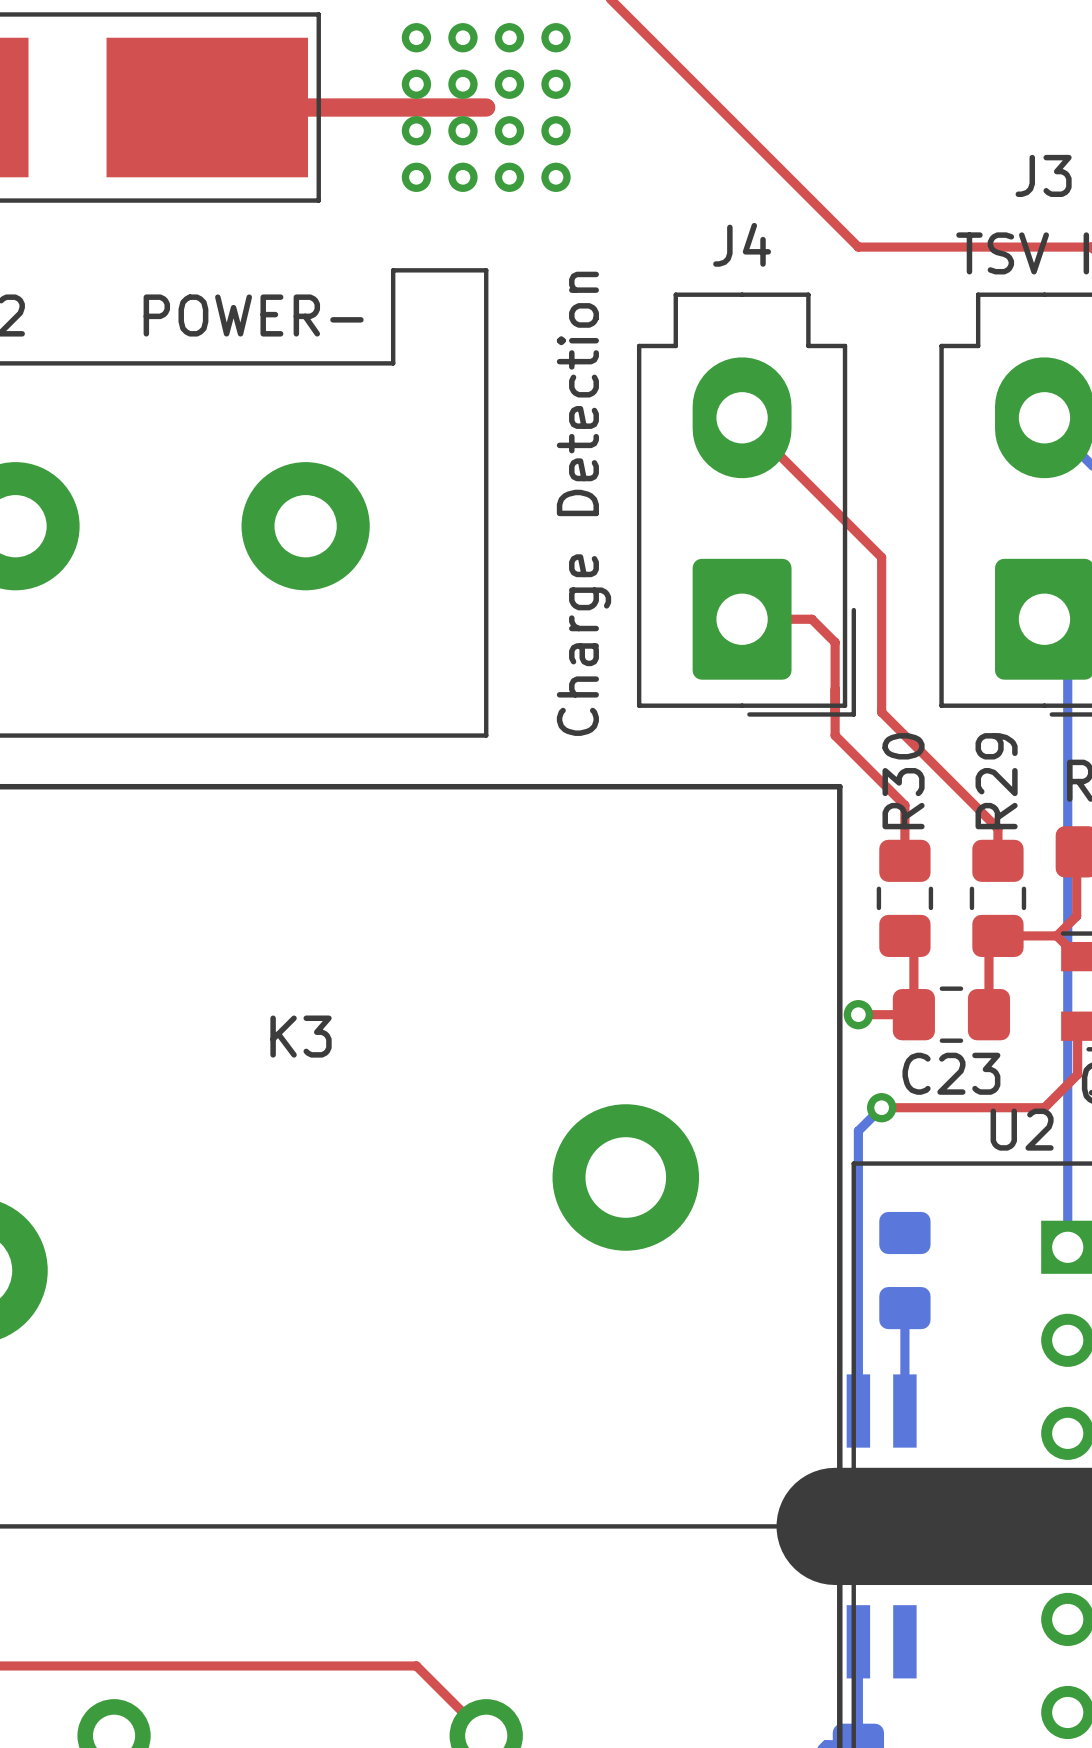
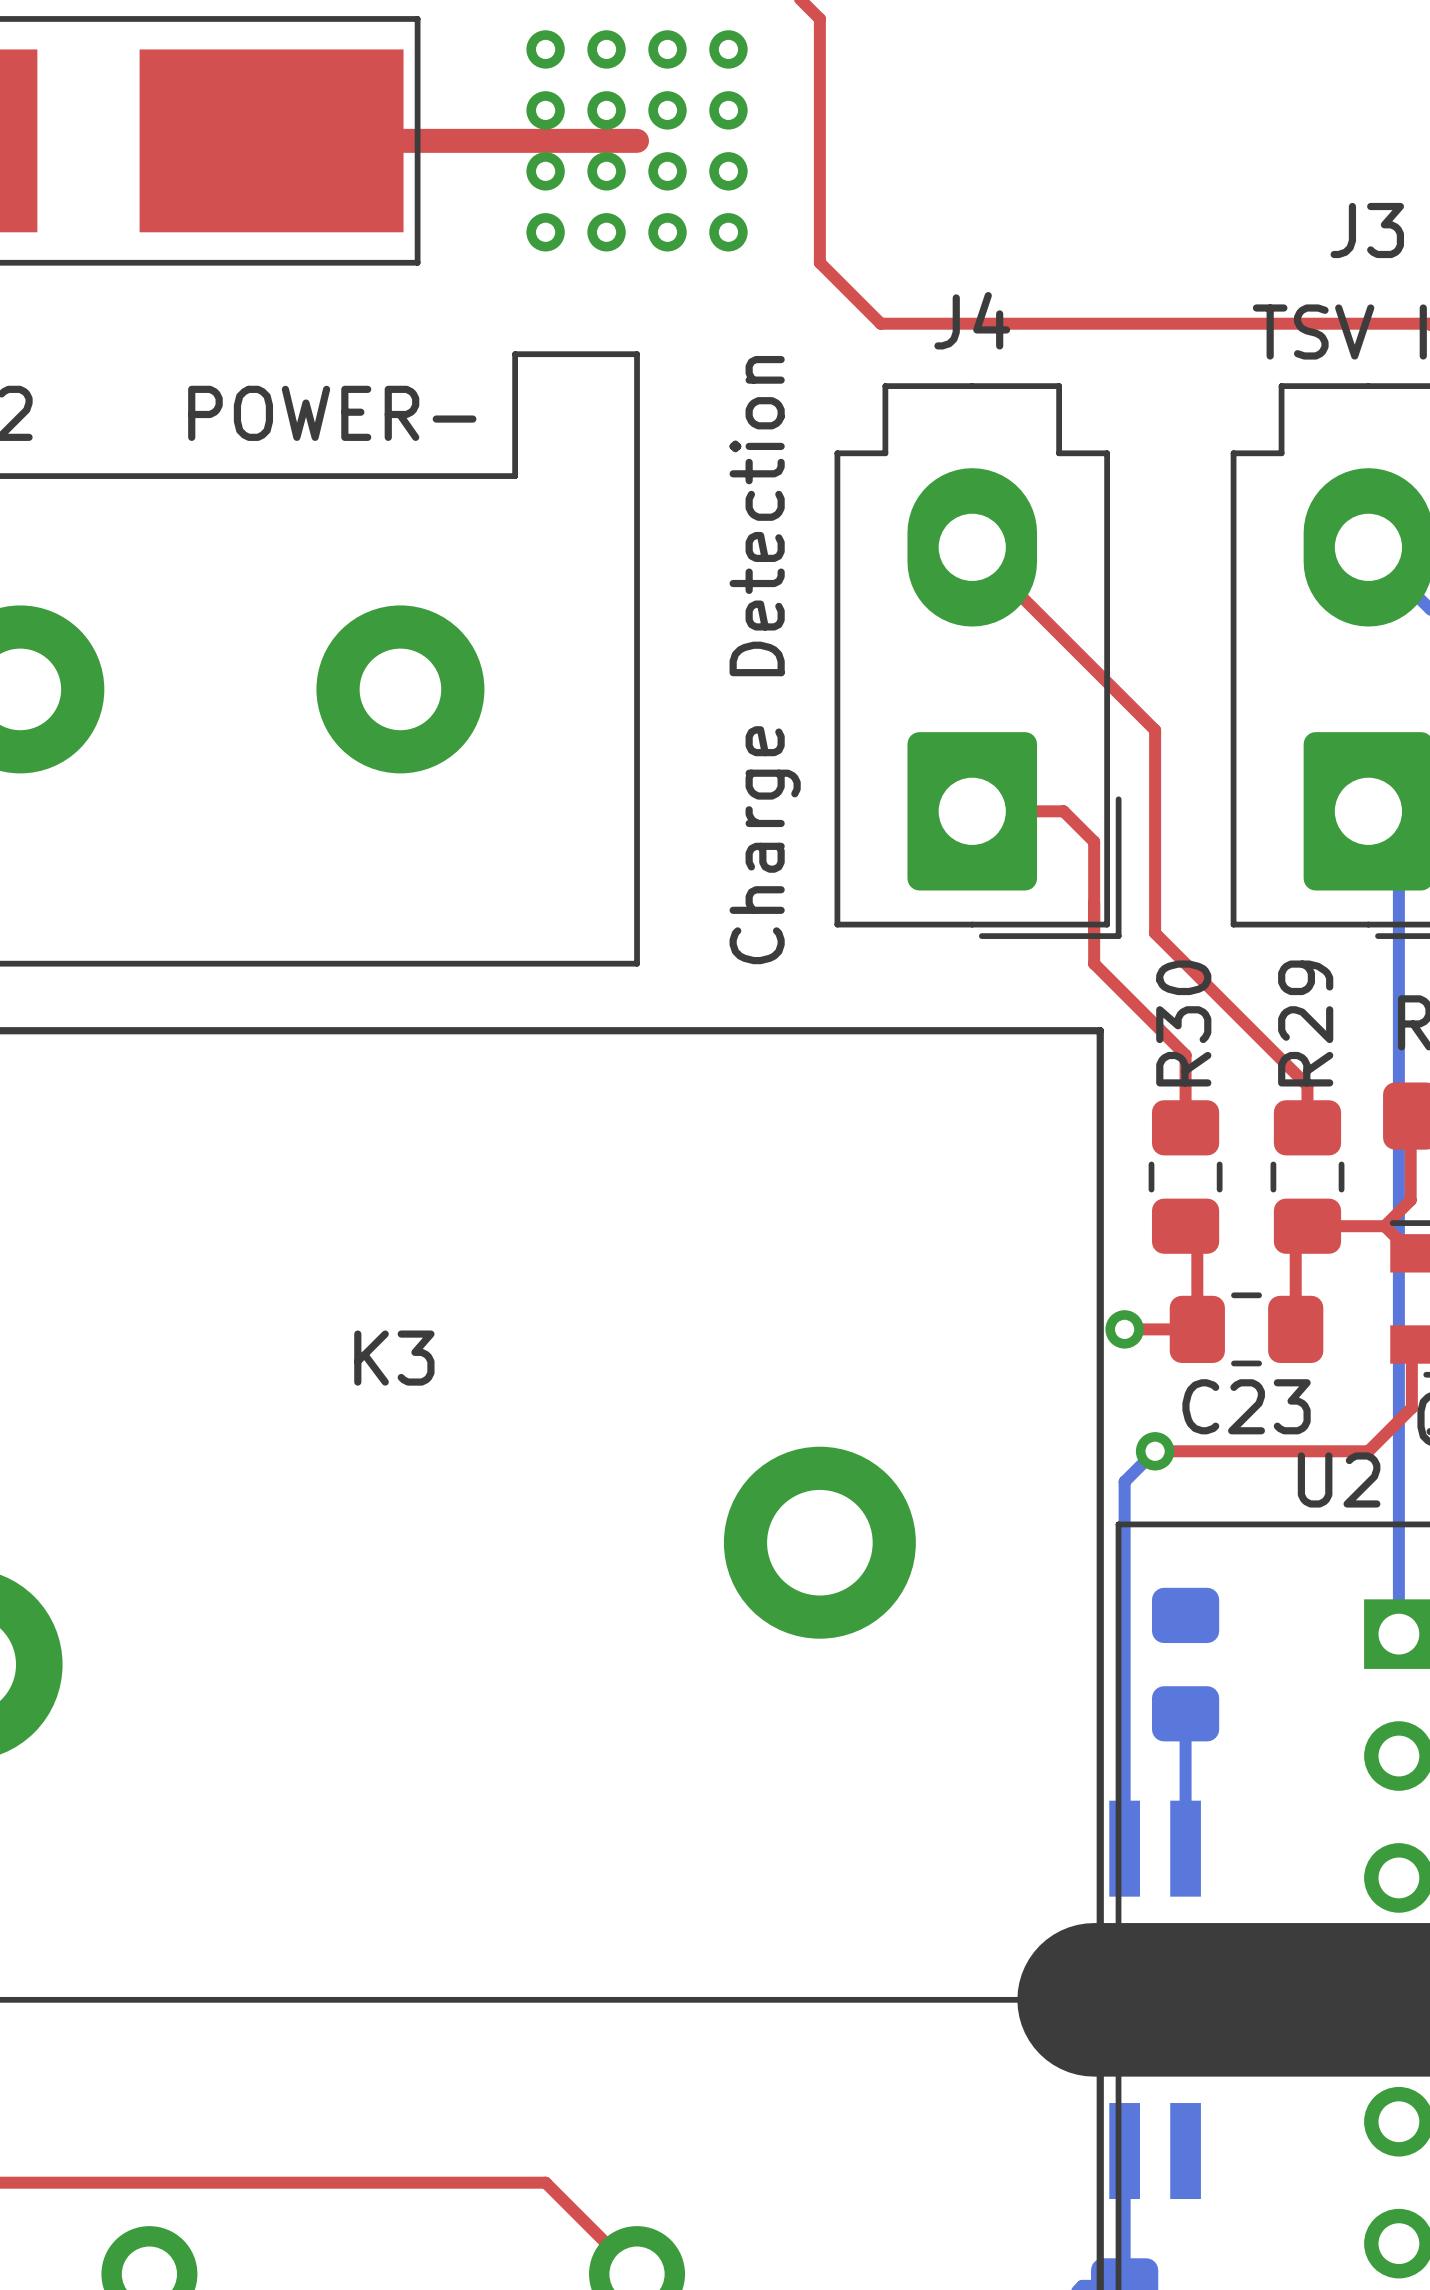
top track: (625, 14) (858, 247) -> (819, 18) (819, 262) (880, 323) (1124, 323)

